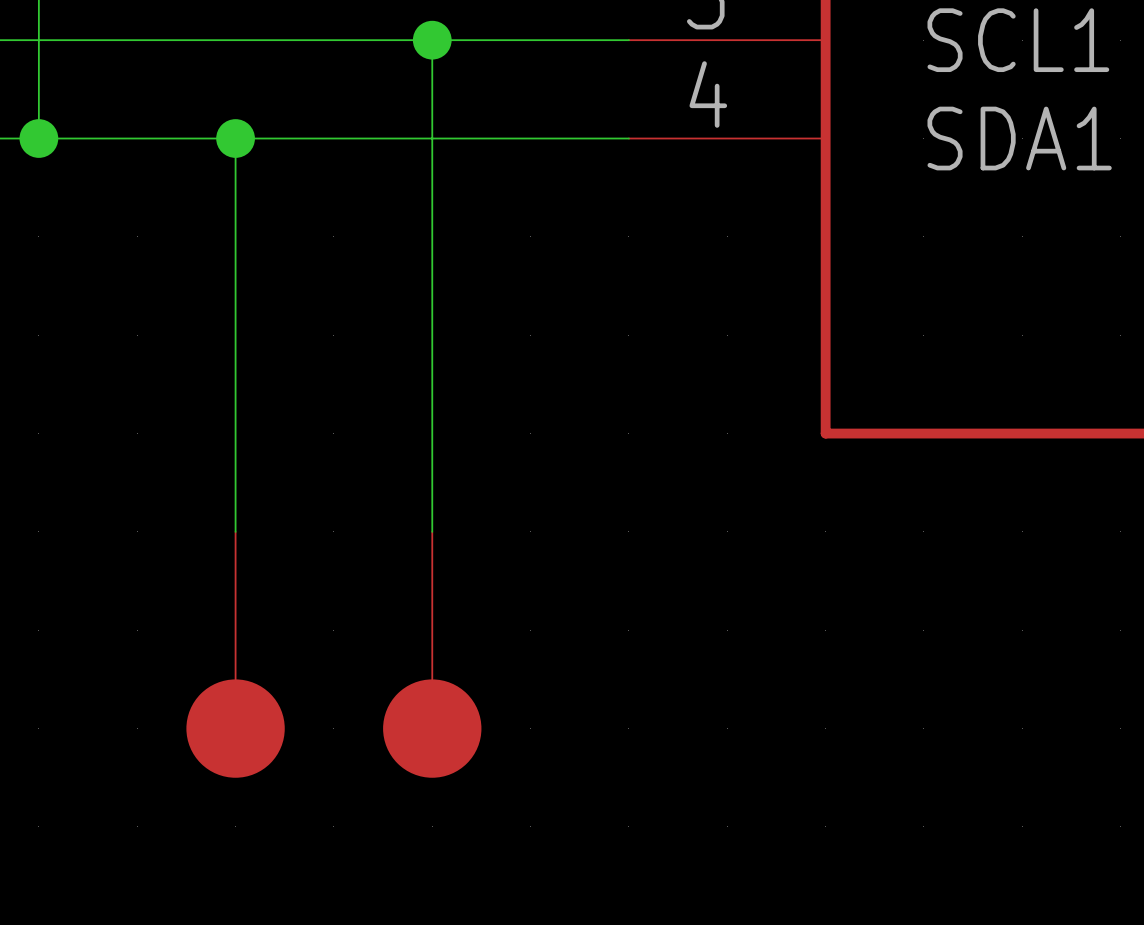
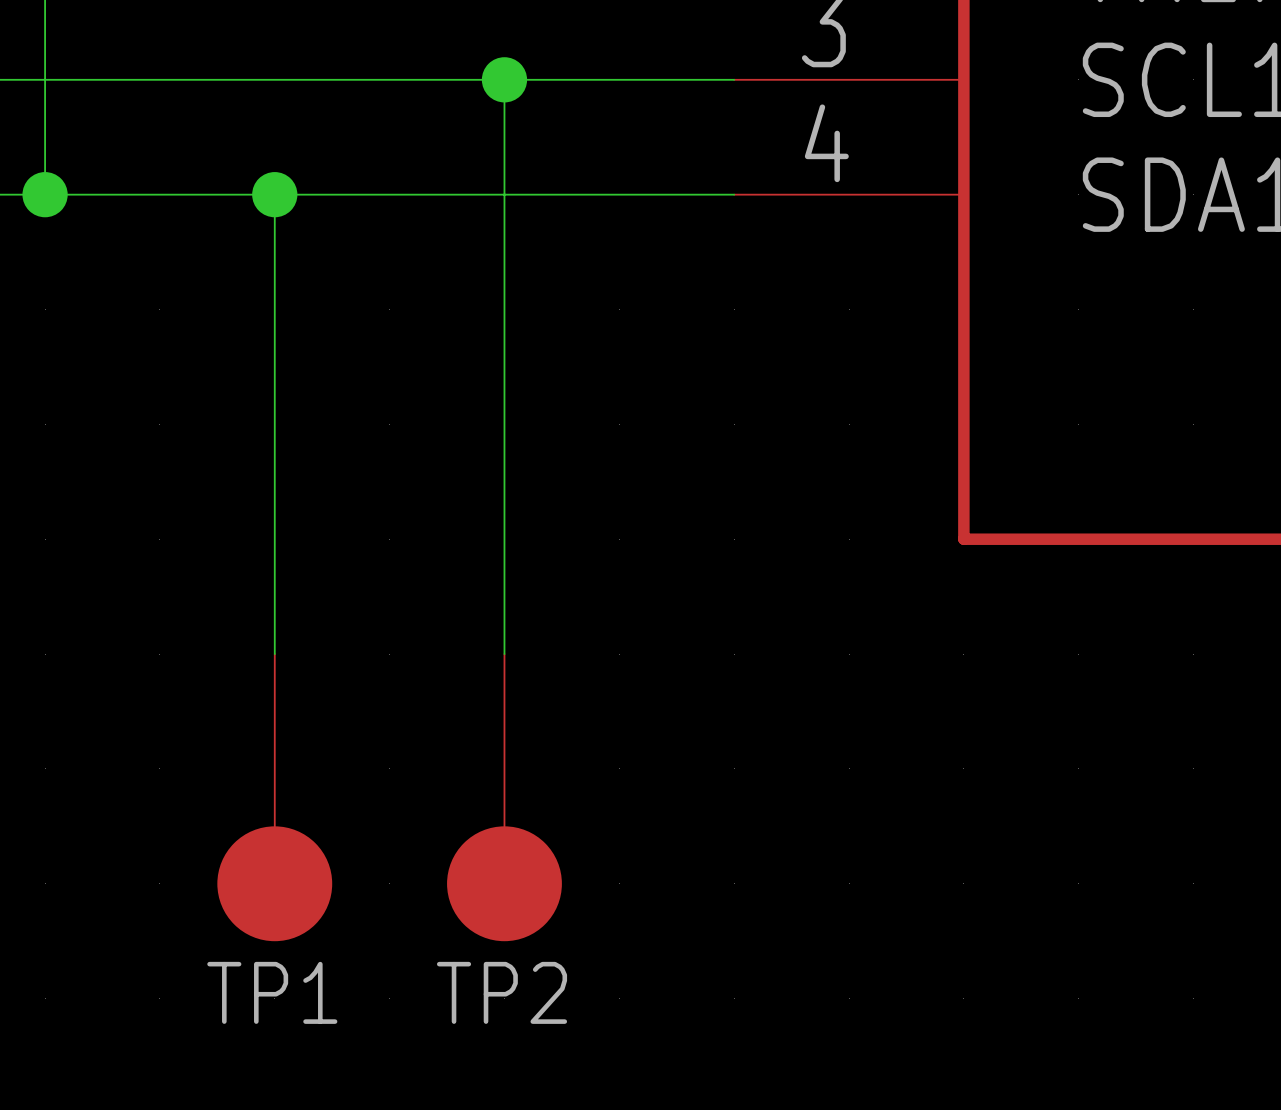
TP1 name: none -> TP1 (272, 992)
TP2 name: none -> TP2 (502, 992)

